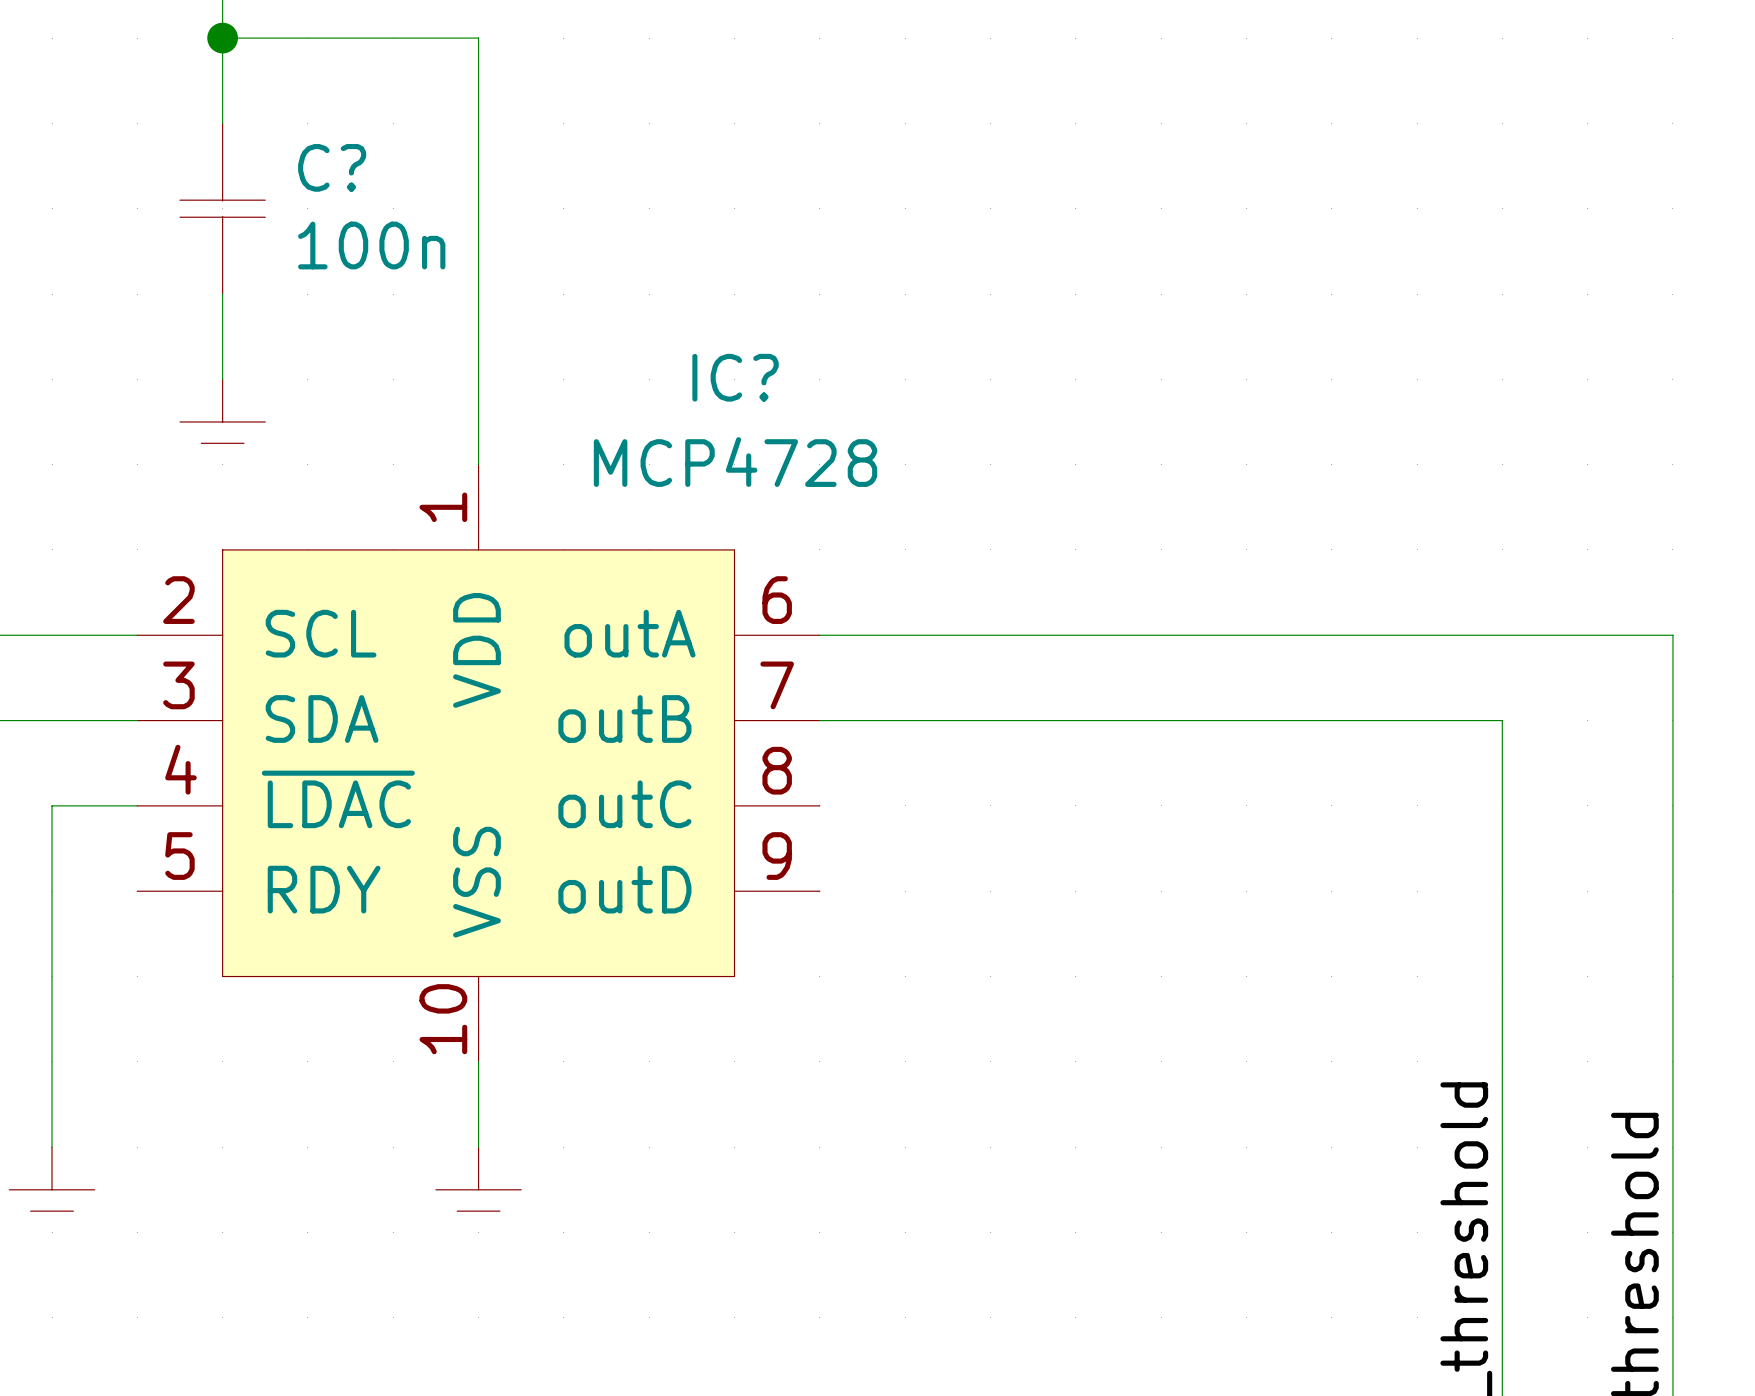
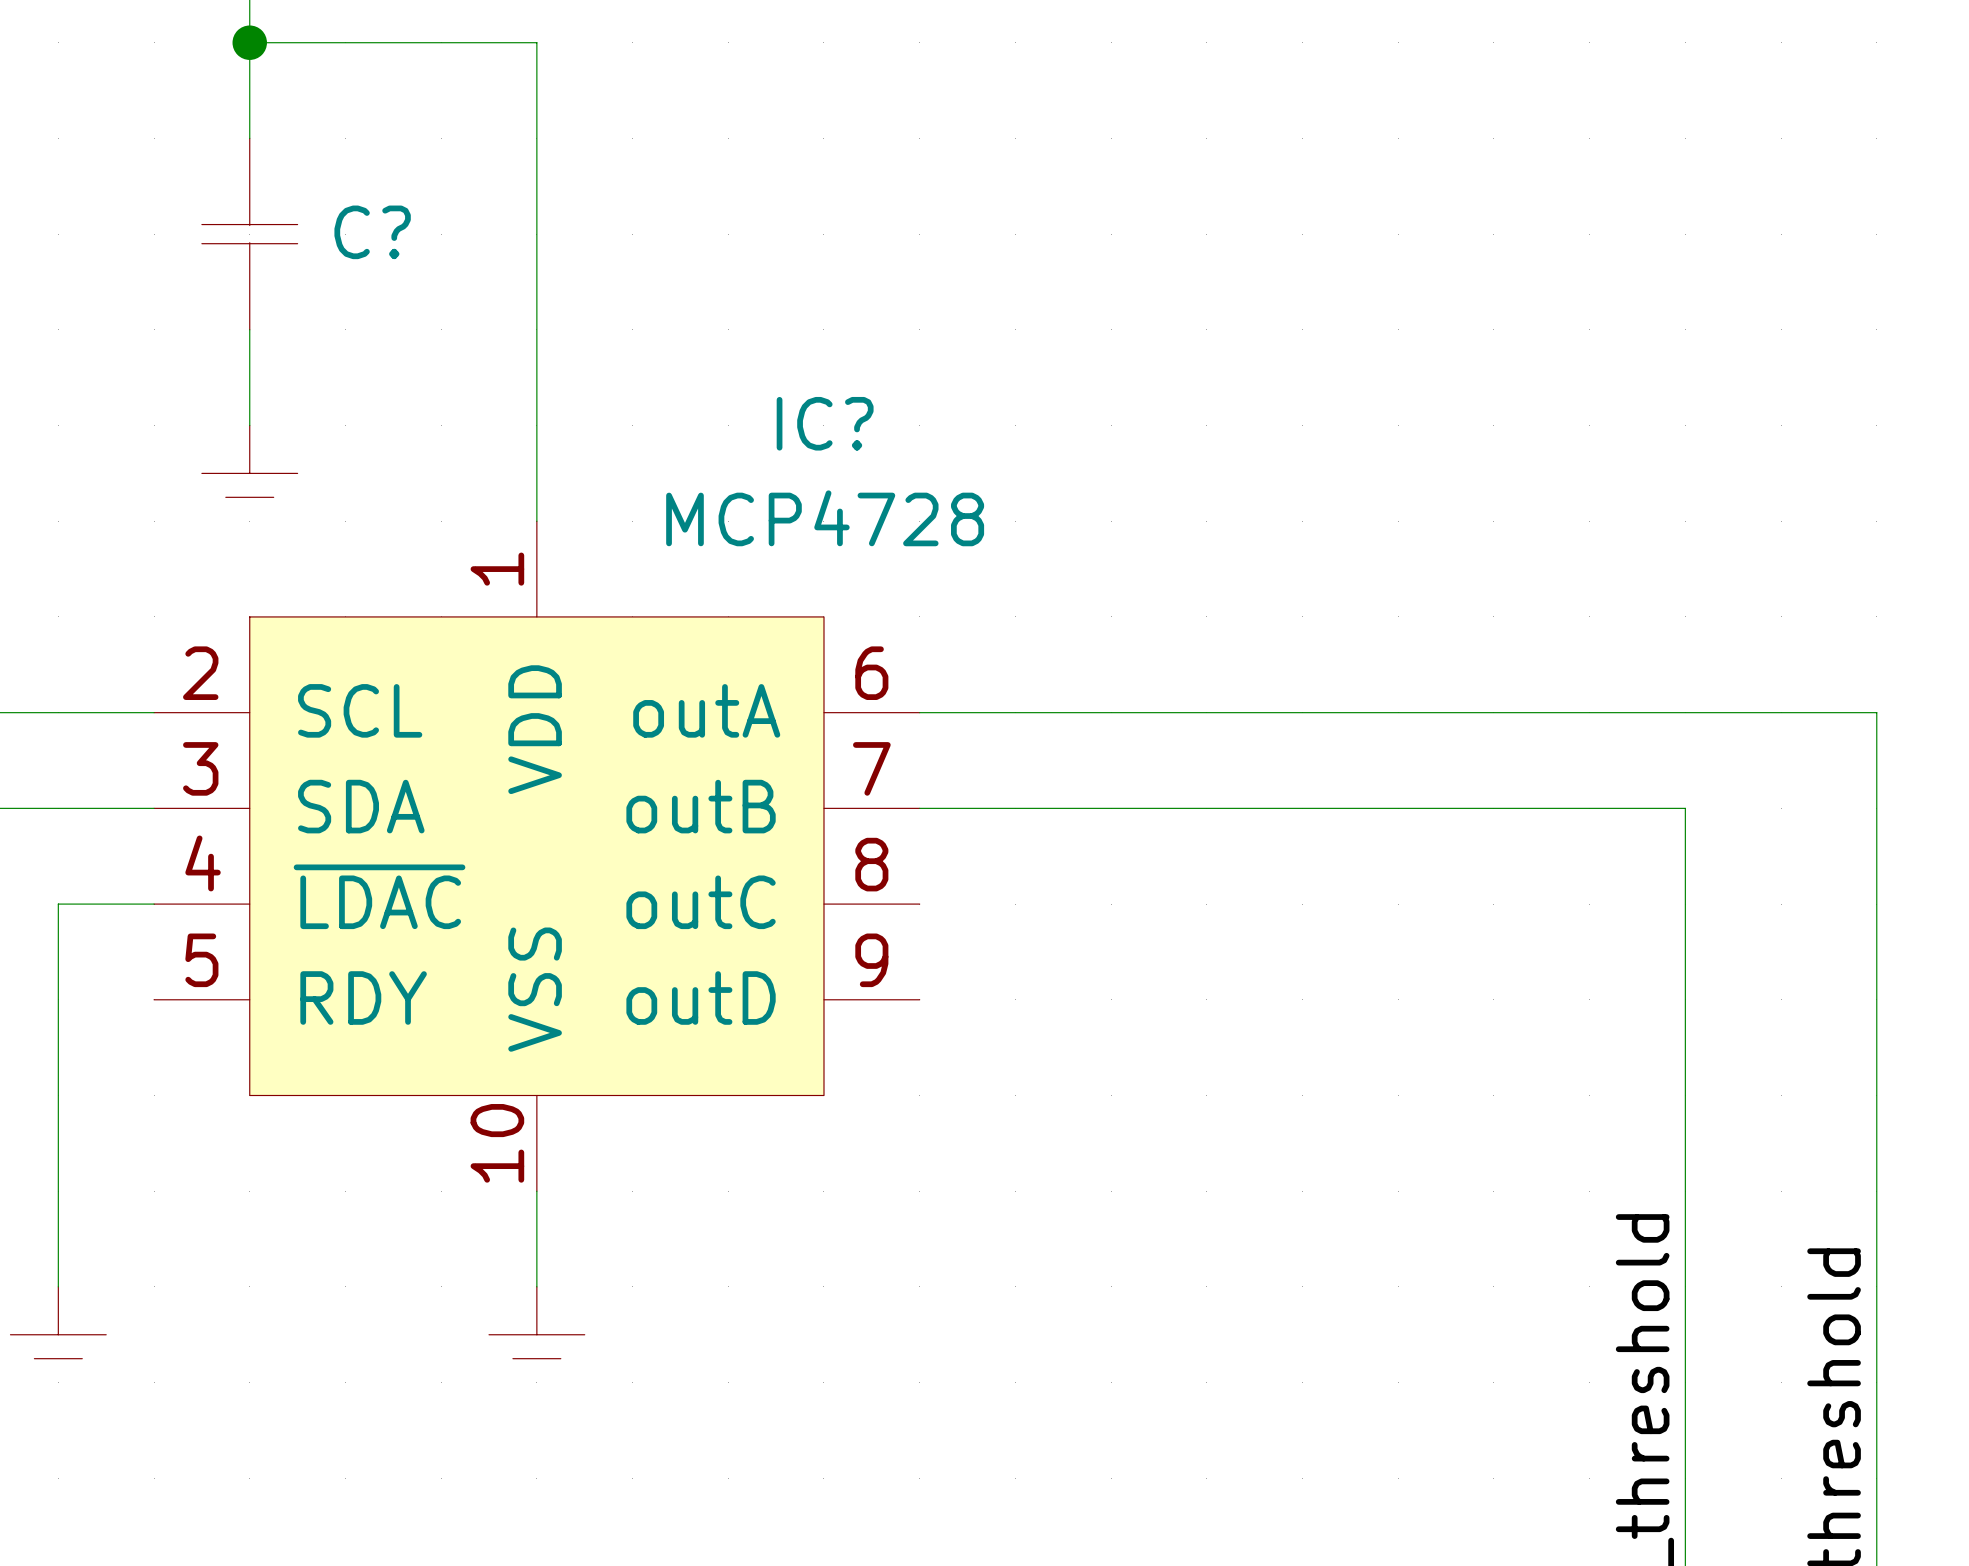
C? name position: C? (332, 167) -> C? (372, 232)
C? value: 100n (371, 245) -> none

